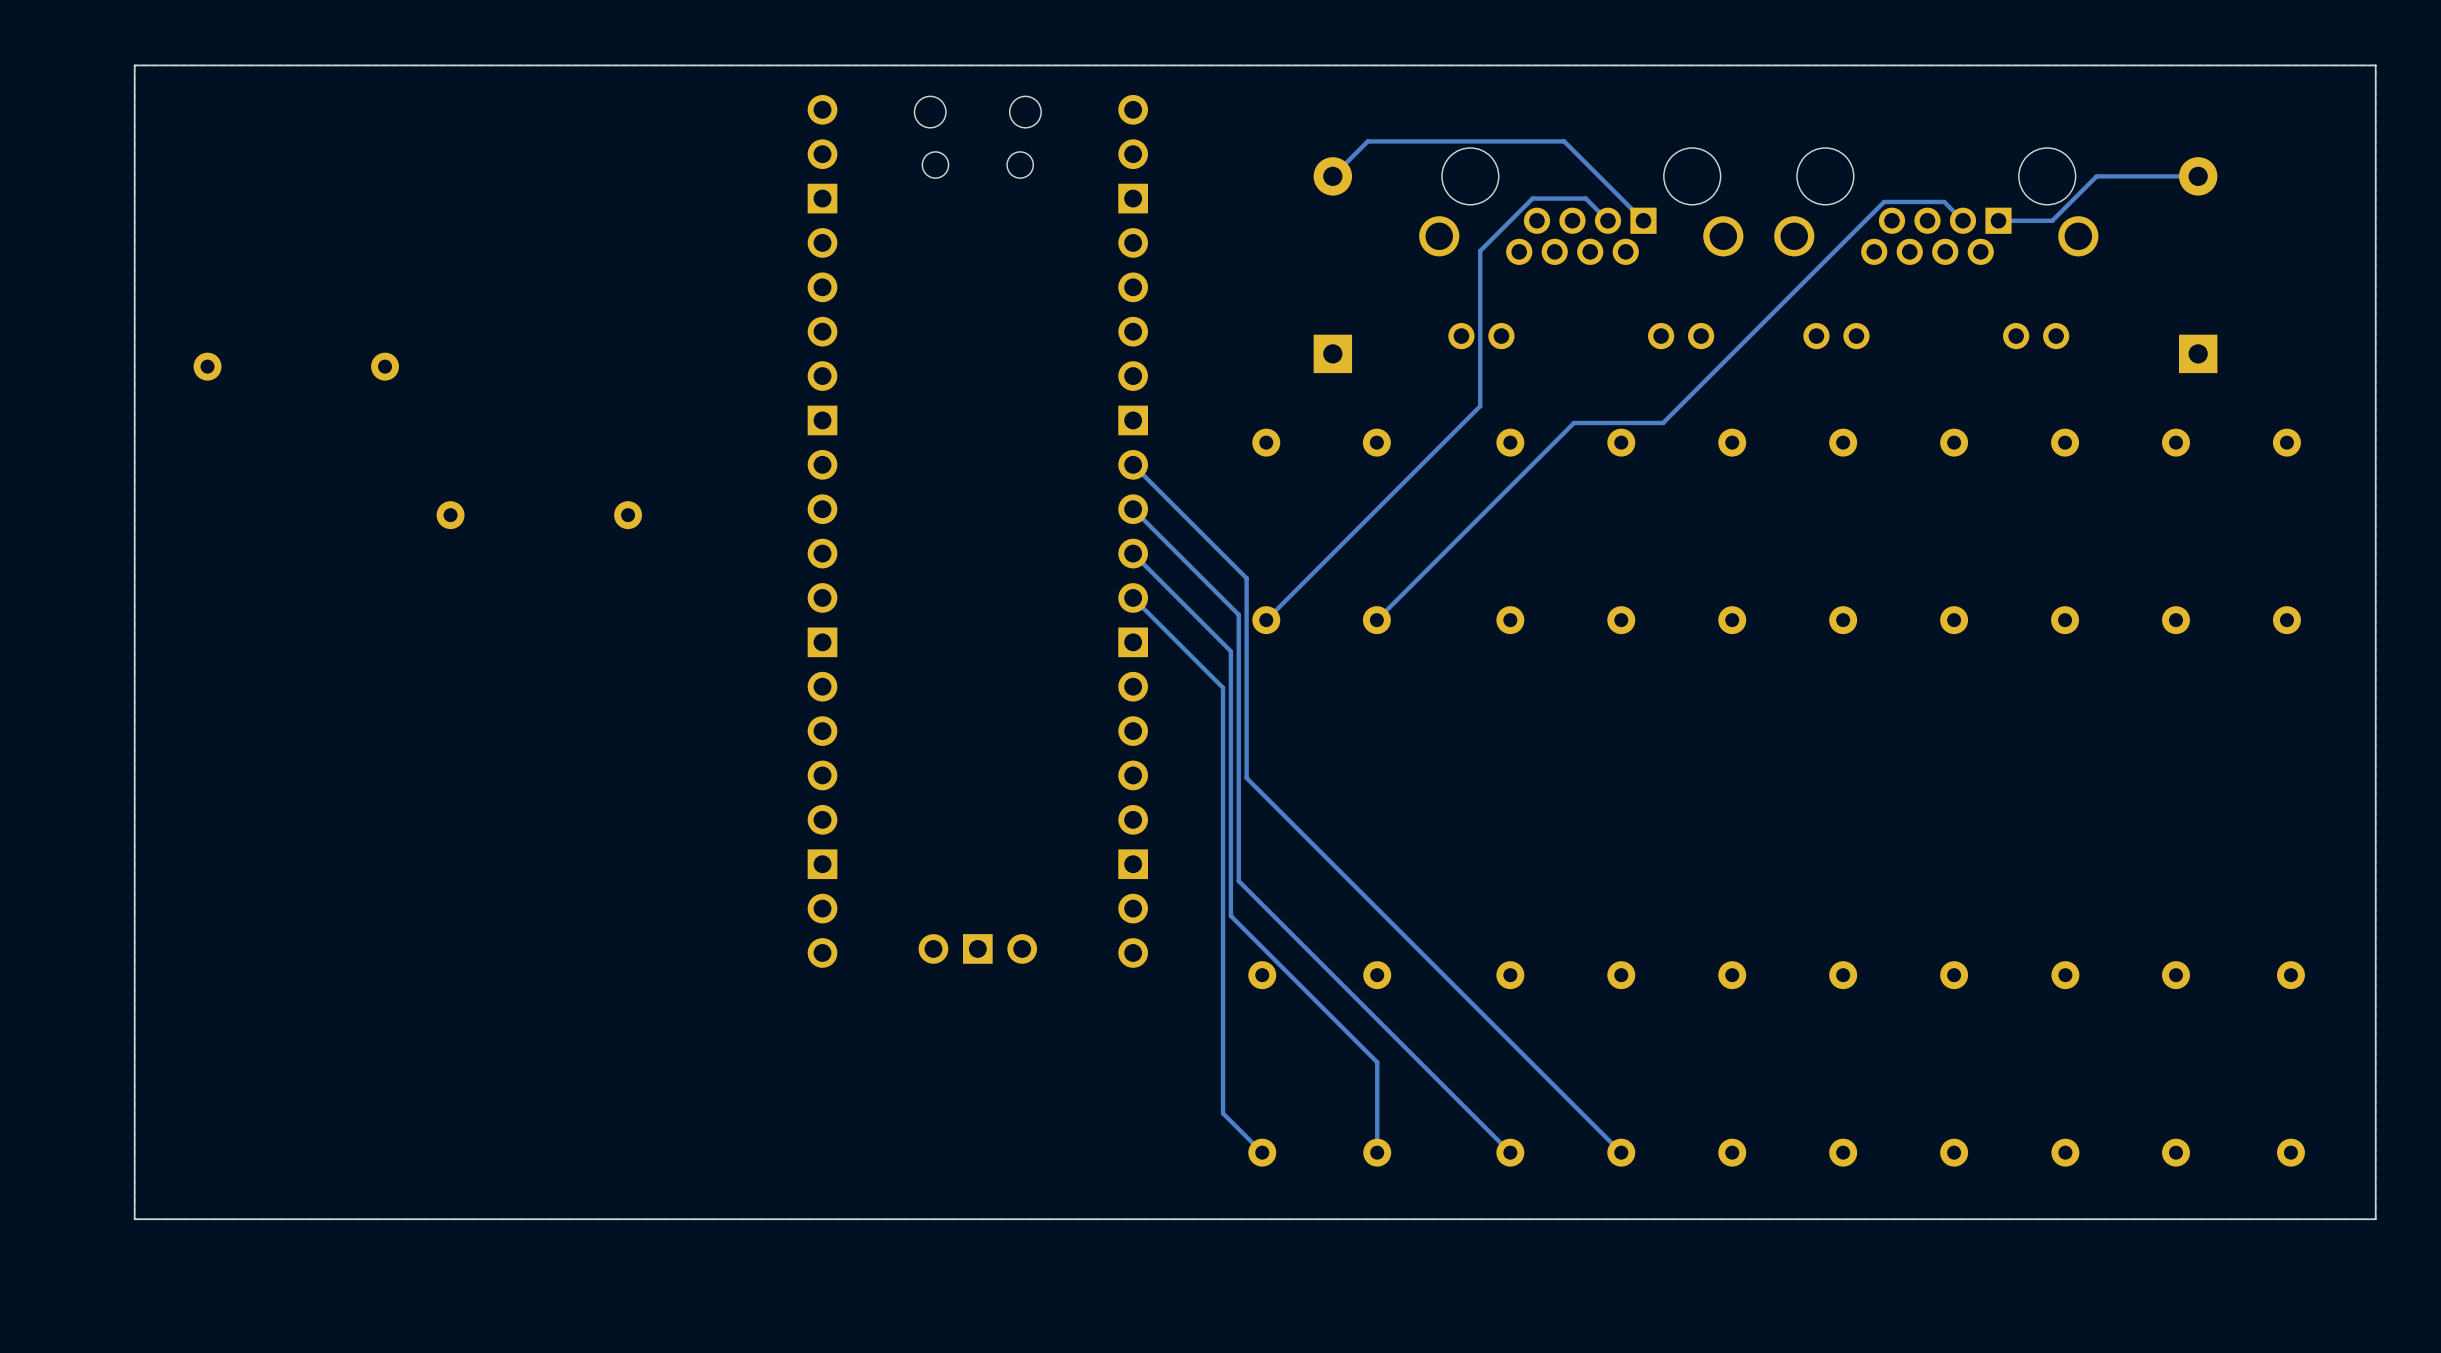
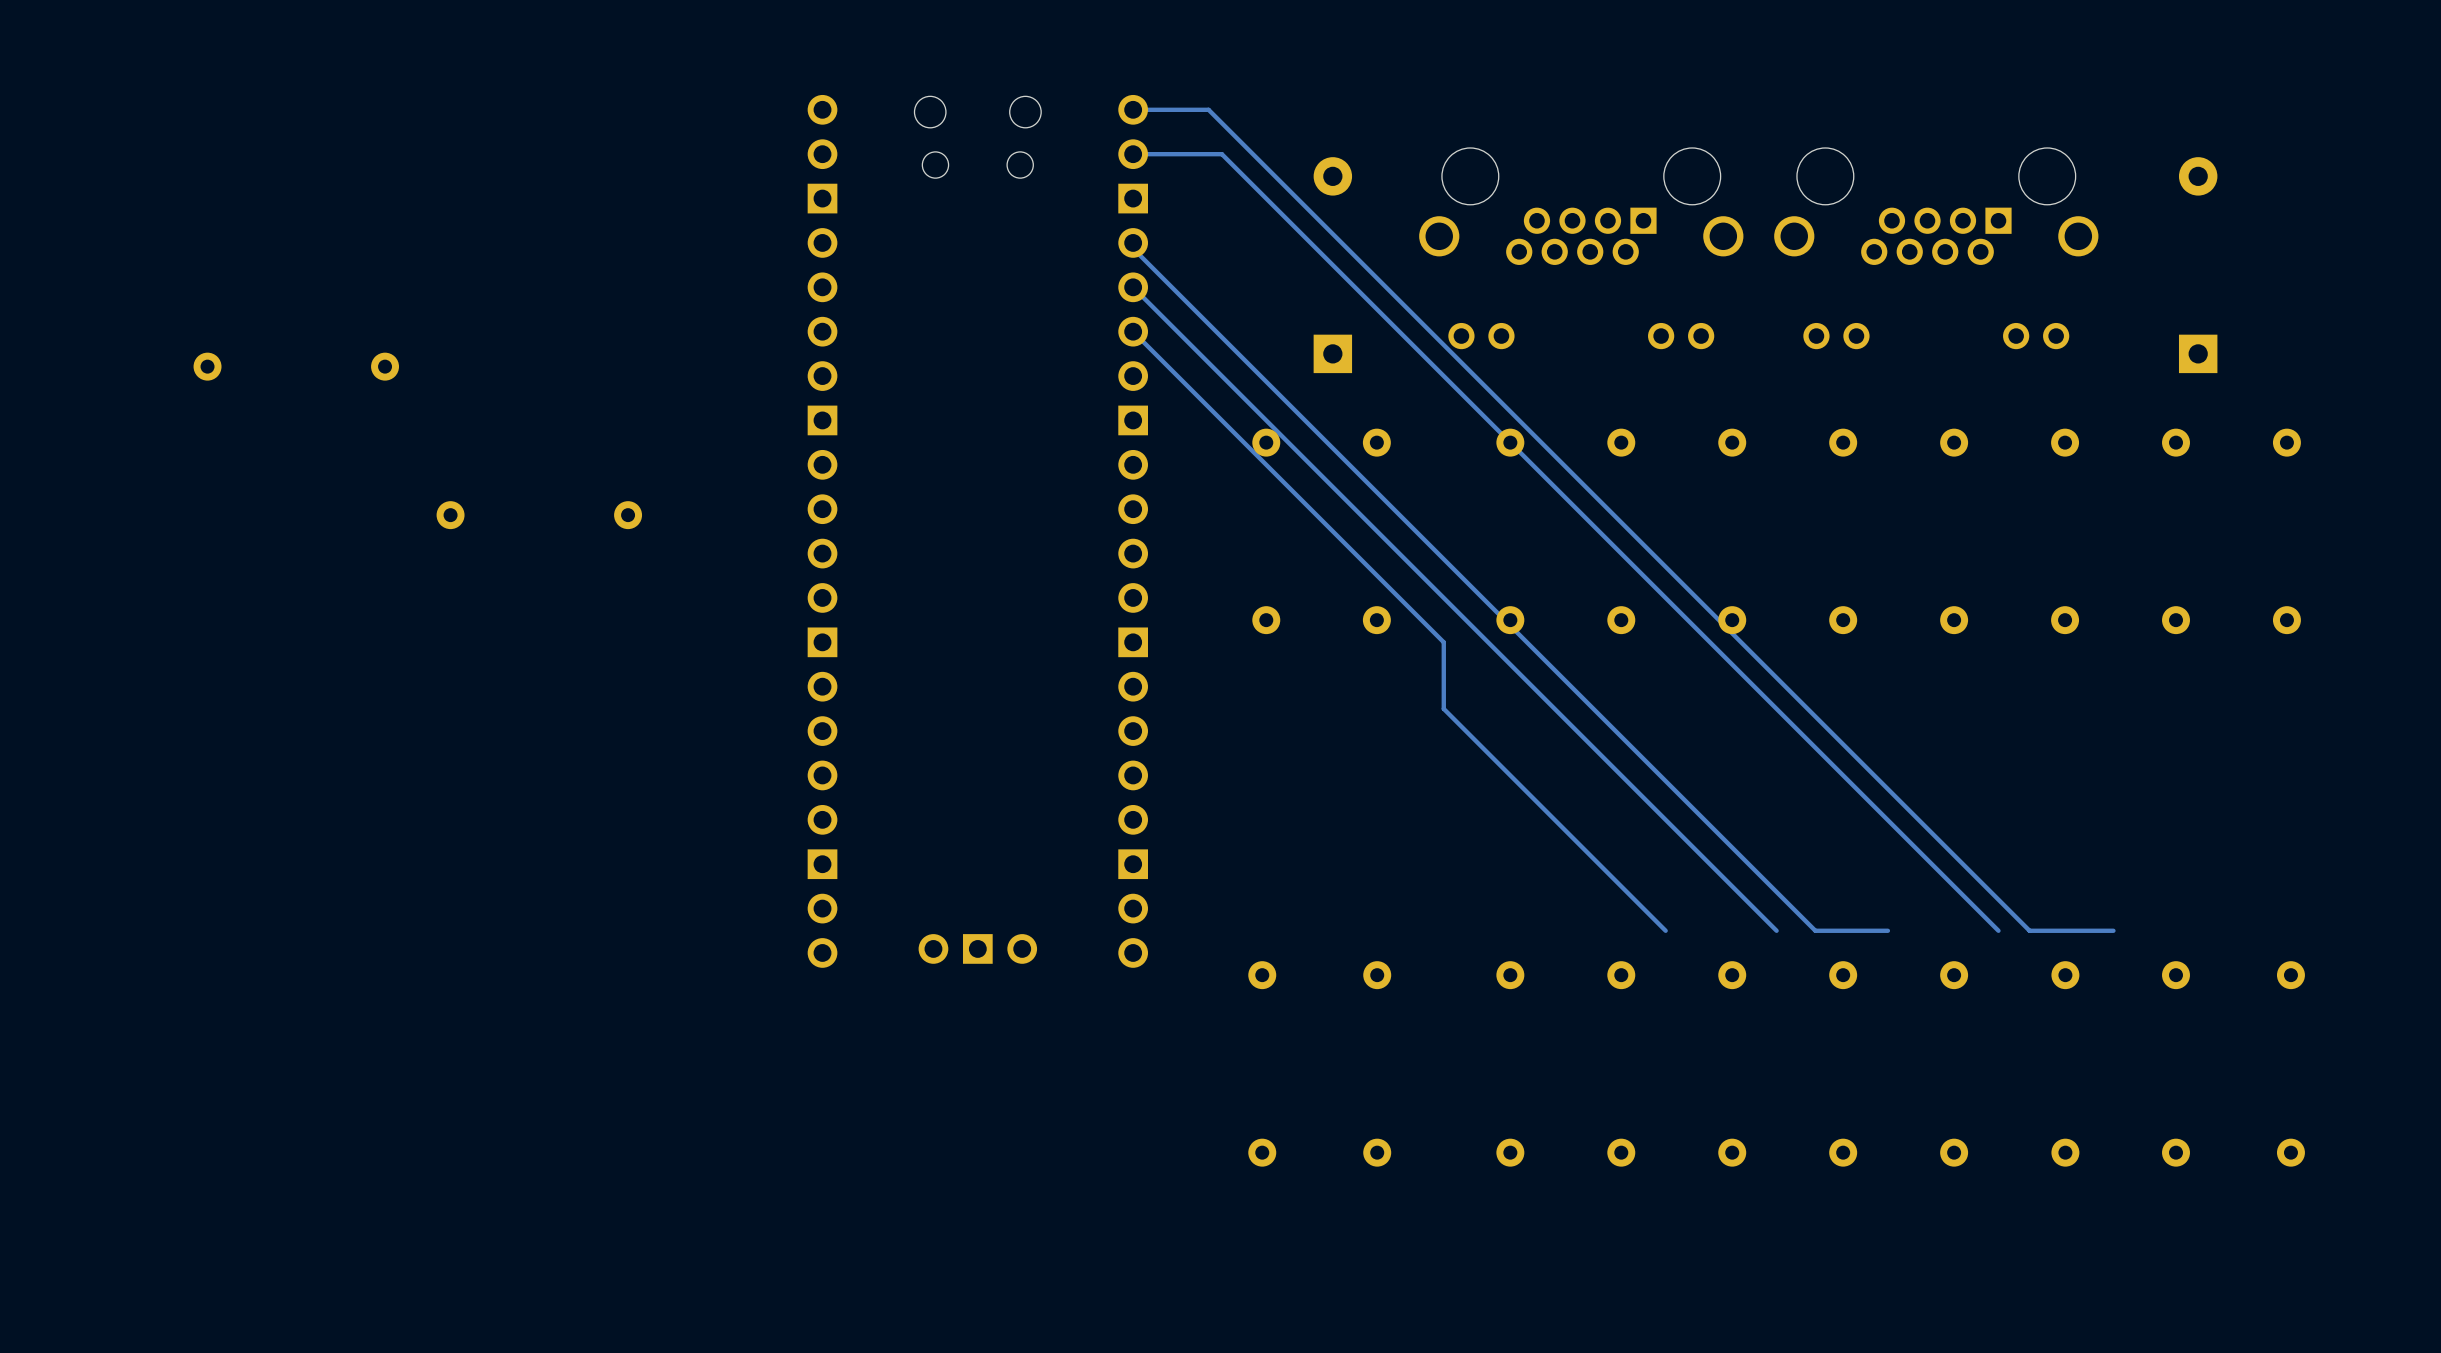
board edge: (2375, 65) (134, 65) (134, 1219) (2375, 1219) (2375, 65) -> none
track: none -> (1133, 109) (1208, 109) (2029, 930) (2113, 930)
track: none -> (1133, 154) (1221, 154) (1998, 930)
track: (1332, 176) (1367, 141) (1564, 141) (1643, 220) -> none
track: (2198, 176) (2096, 176) (2052, 220) (1998, 220) -> none
track: (1607, 220) (1585, 198) (1532, 198) (1480, 250) (1480, 406) (1266, 620) -> none
track: (1962, 220) (1944, 201) (1884, 201) (1663, 422) (1574, 422) (1376, 620) -> none
track: none -> (1133, 242) (1133, 248) (1815, 930) (1887, 930)
track: none -> (1133, 287) (1776, 930)
track: none -> (1133, 331) (1443, 642) (1443, 708) (1665, 930)
track: (1133, 464) (1246, 578) (1246, 777) (1621, 1152) -> none
track: (1133, 509) (1238, 614) (1238, 881) (1510, 1152) -> none
track: (1133, 553) (1230, 651) (1230, 916) (1377, 1062) (1377, 1152) -> none
track: (1133, 597) (1223, 687) (1223, 1113) (1262, 1152) -> none

